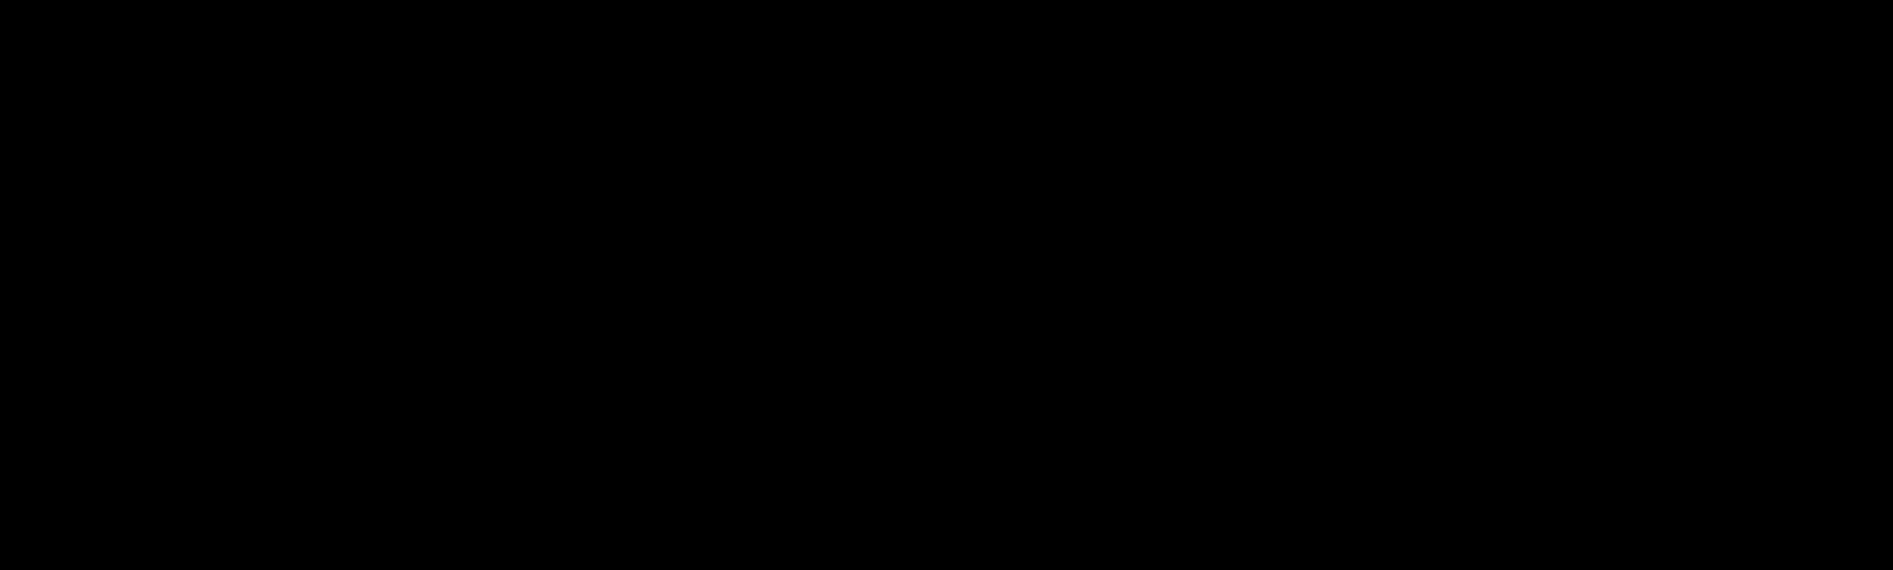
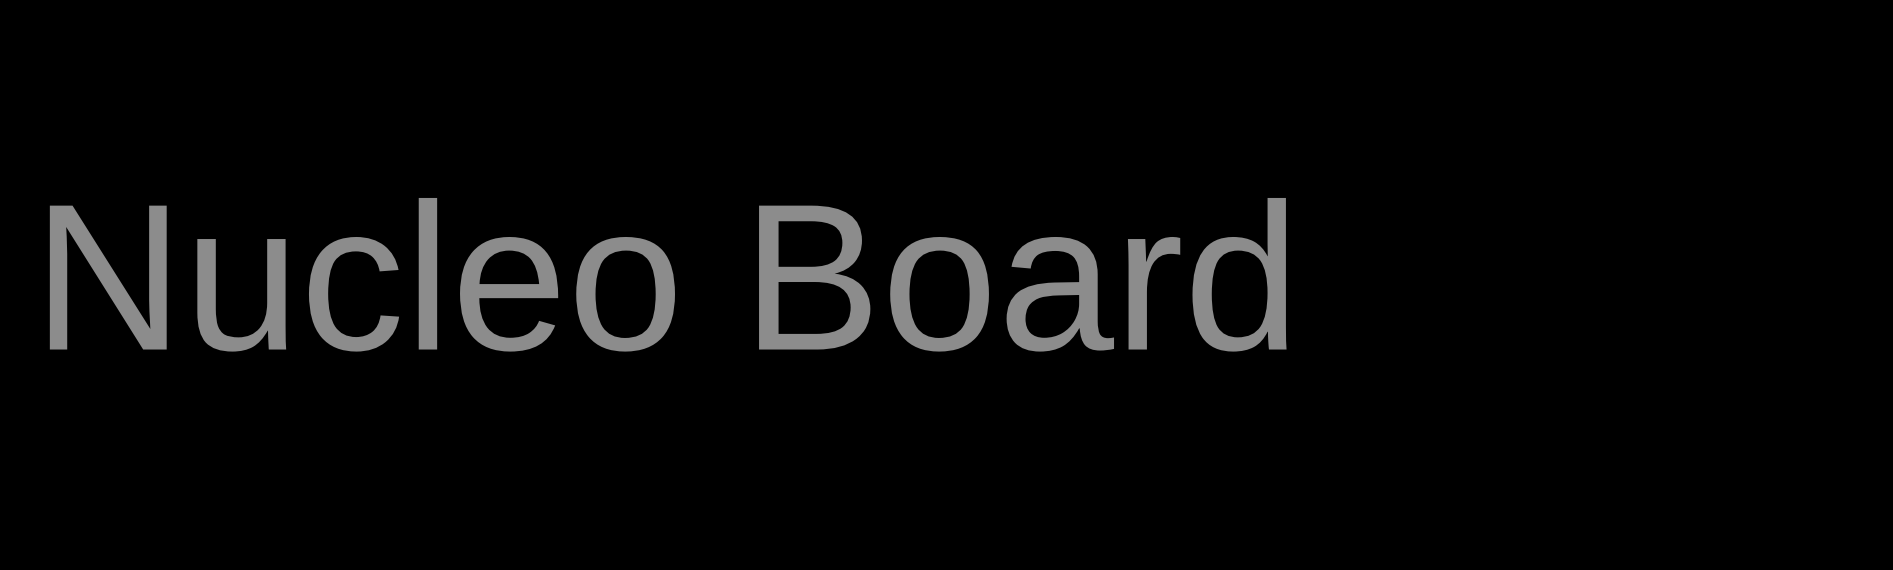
text: none -> Nucleo Board (668, 274)

